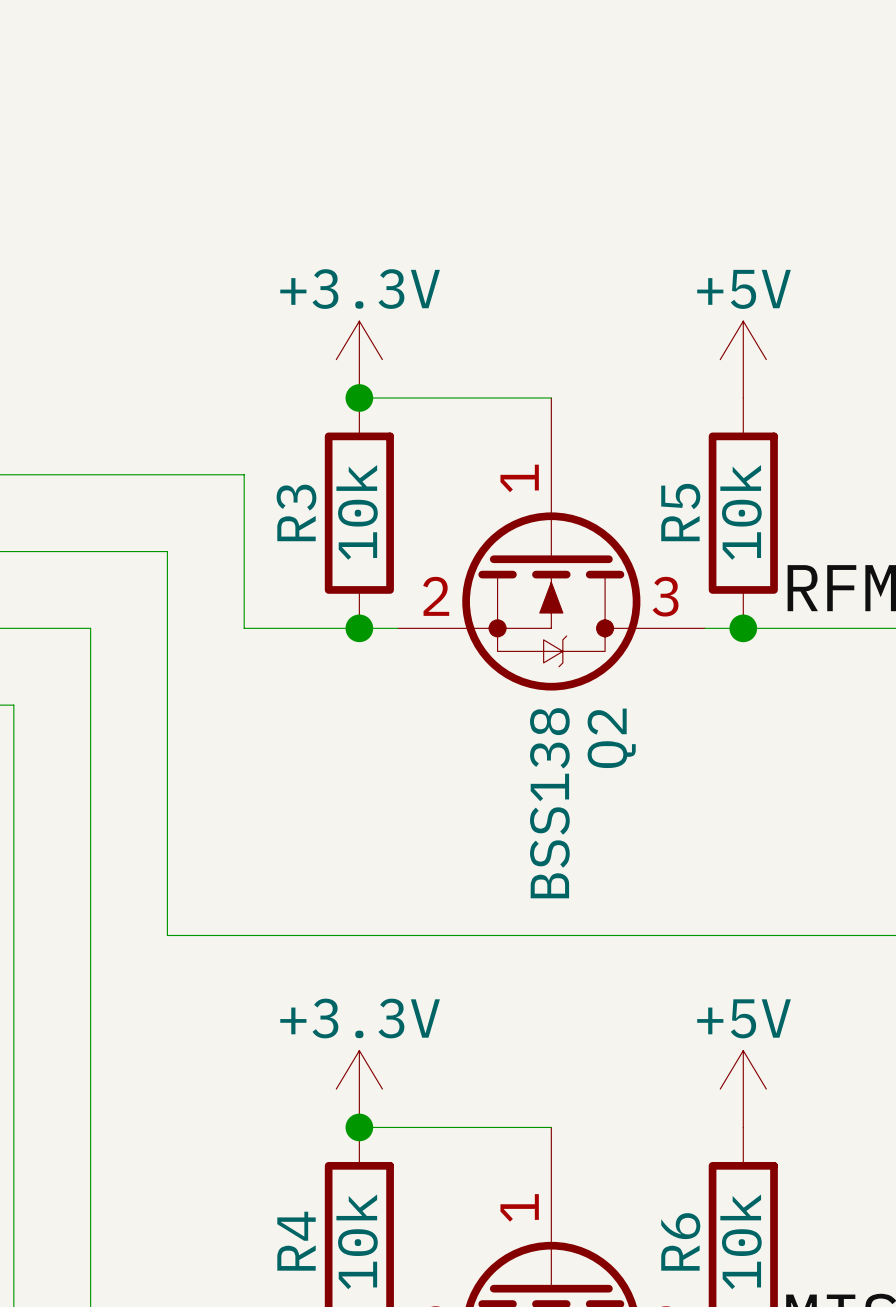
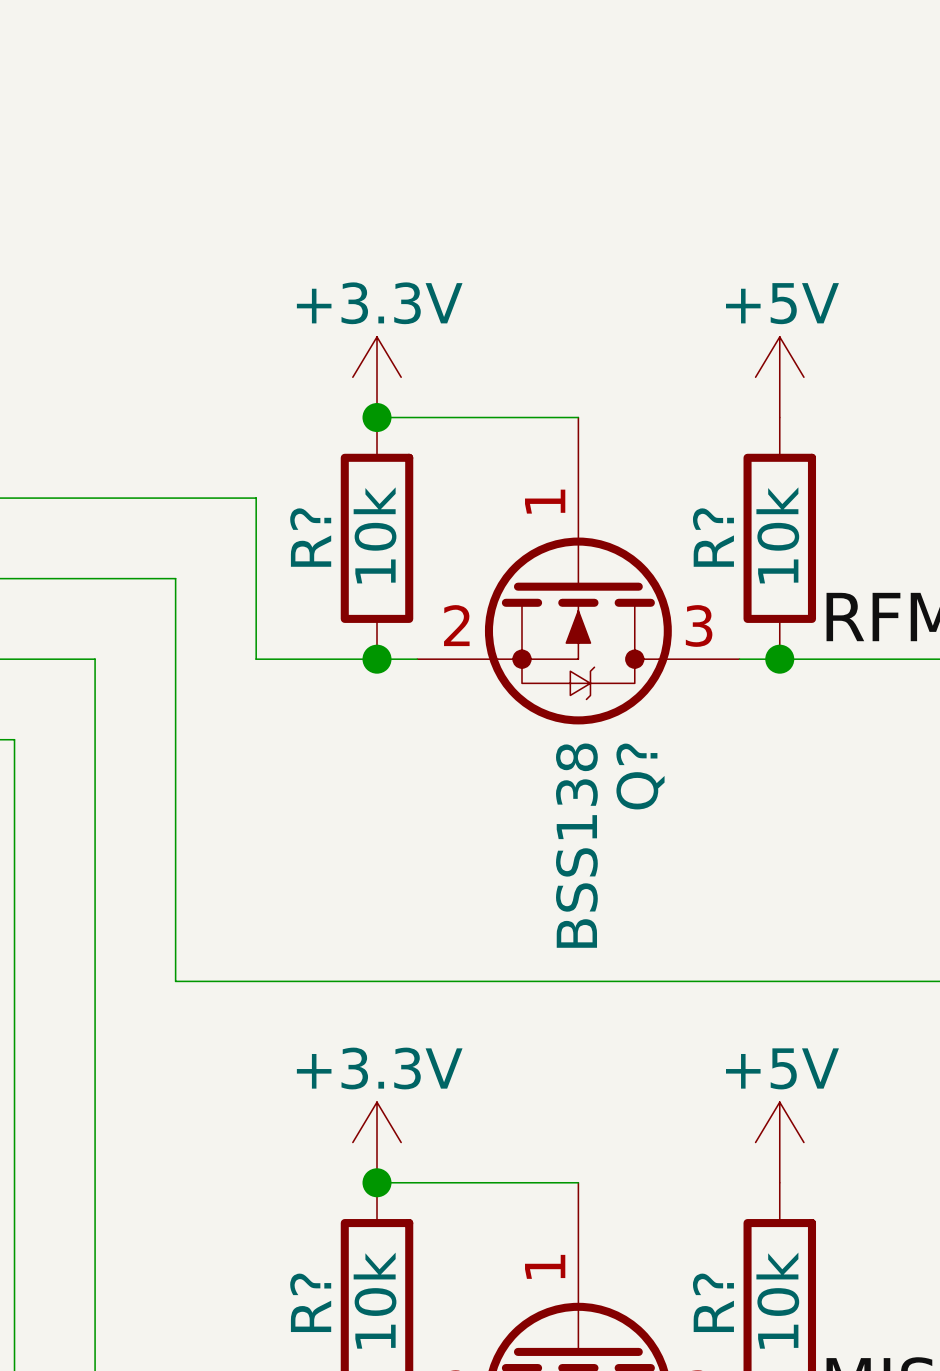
R3 name: R3 (296, 512) -> R? (310, 537)
R5 name: R5 (680, 512) -> R? (713, 537)
Q2 name: Q2 (611, 738) -> Q? (640, 776)
R4 name: R4 (296, 1241) -> R? (310, 1302)
R6 name: R6 (680, 1241) -> R? (713, 1302)

